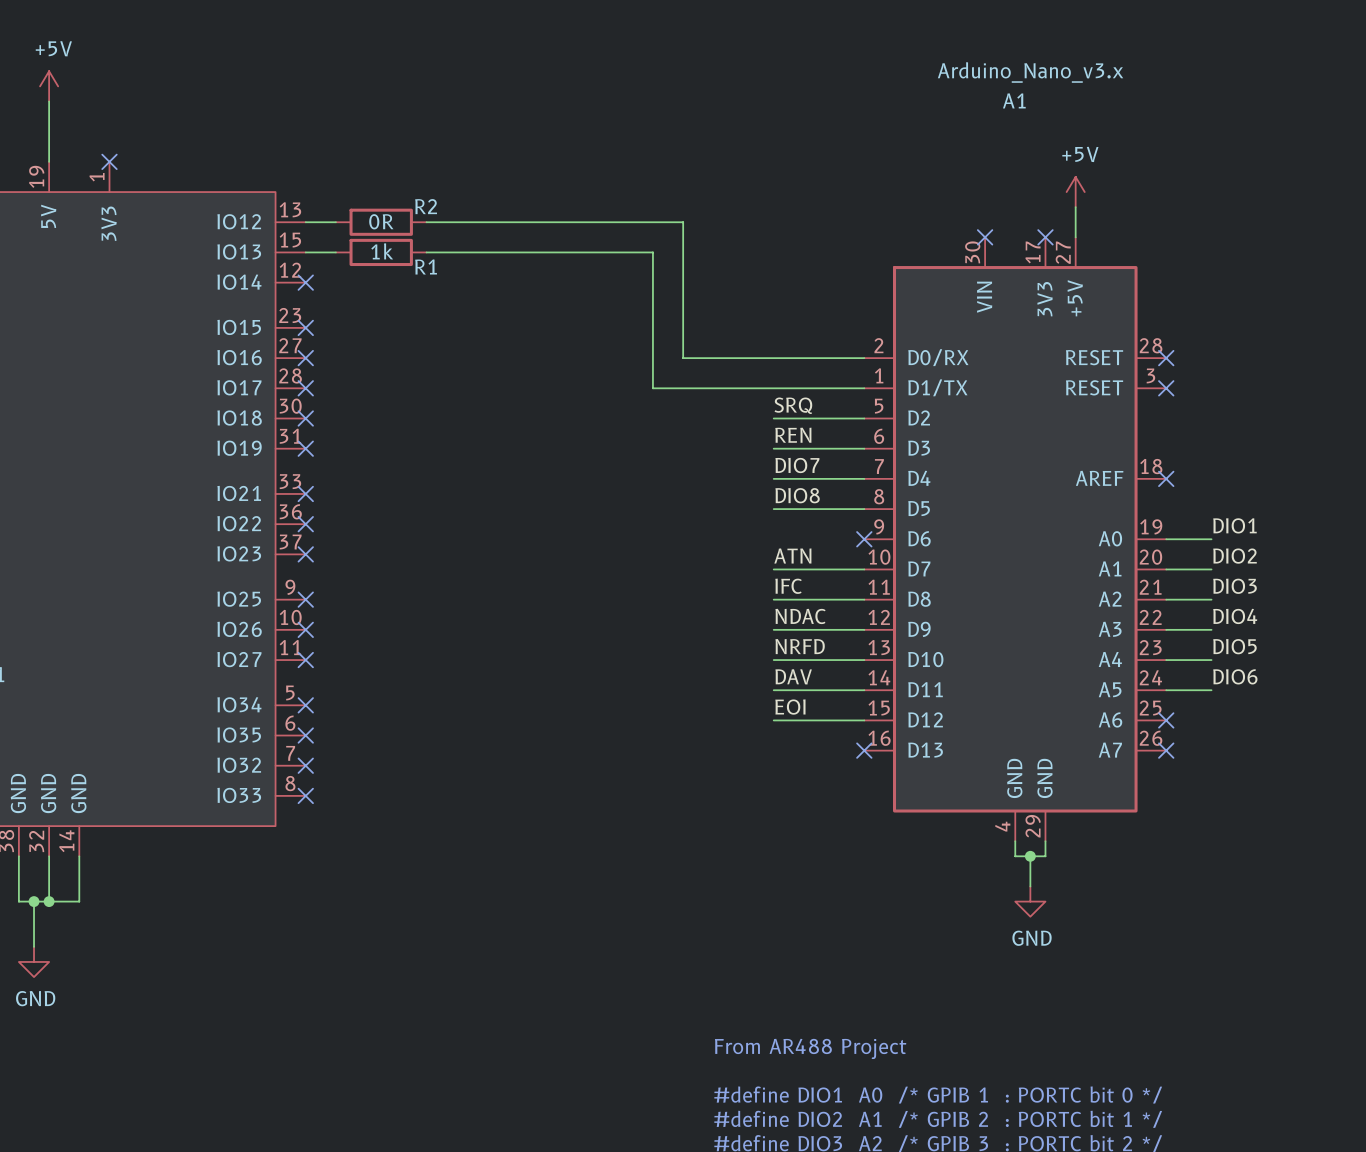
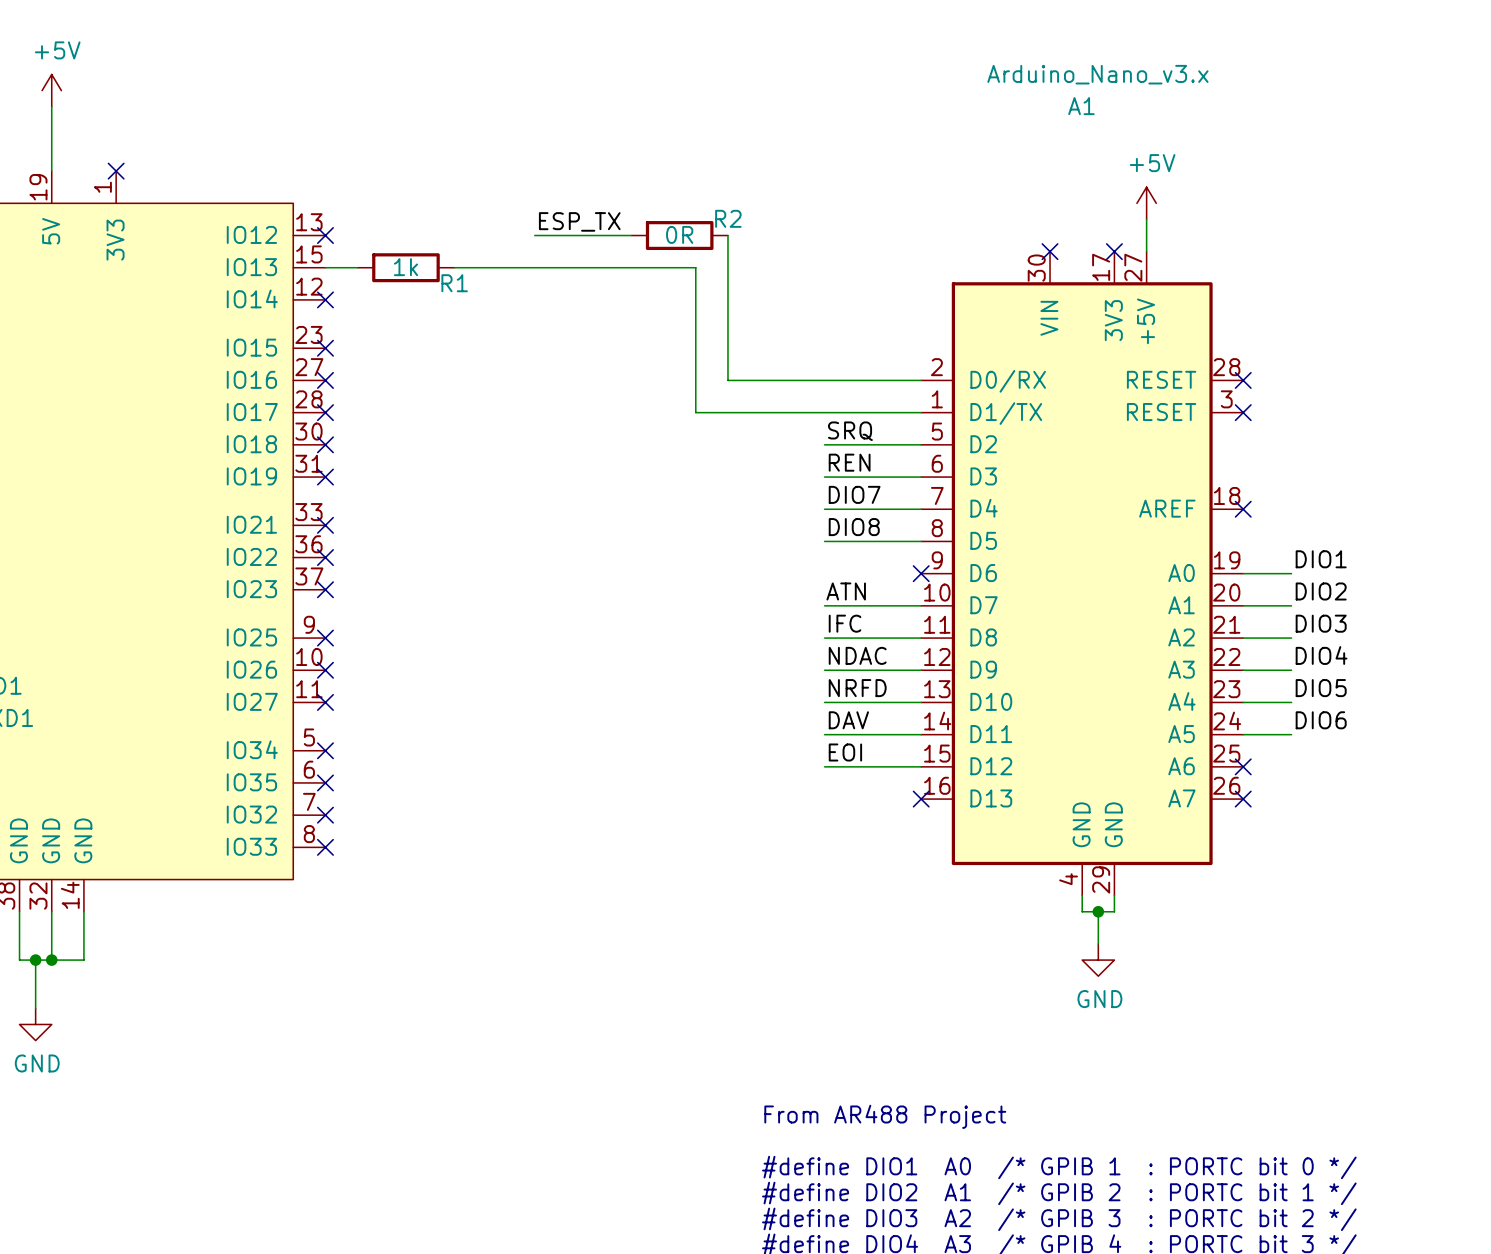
label: none -> ESP_TX (579, 221)
wire: (305, 222) (335, 222) -> none
no-connect mark: none -> (325, 235)
R2 position: (381, 222) -> (679, 235)
wire: (426, 222) (502, 222) -> none
wire: (592, 222) (683, 222) -> none

